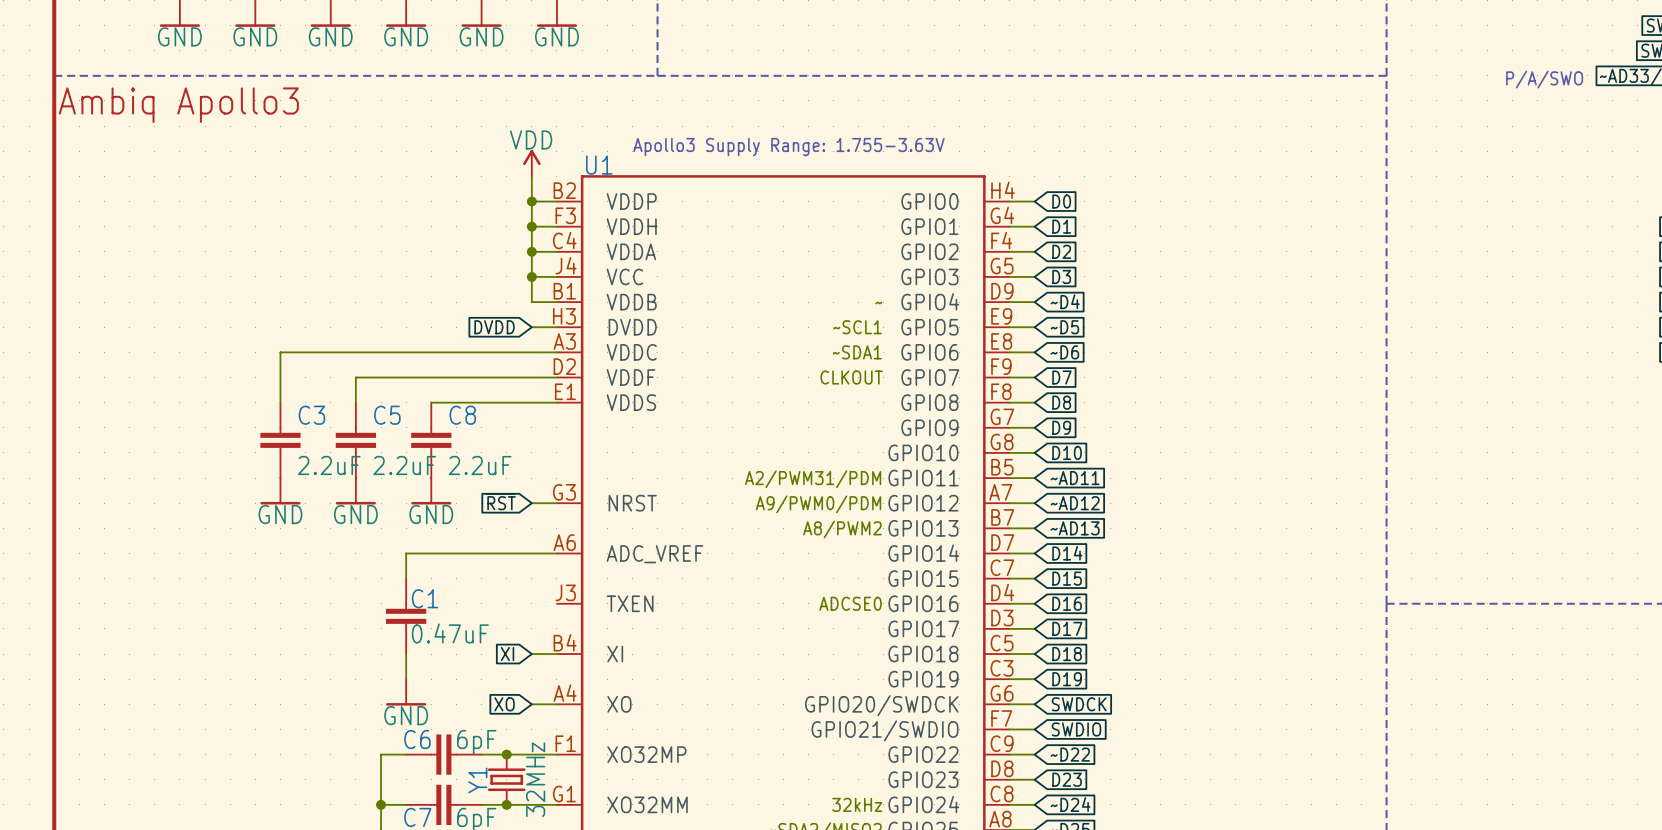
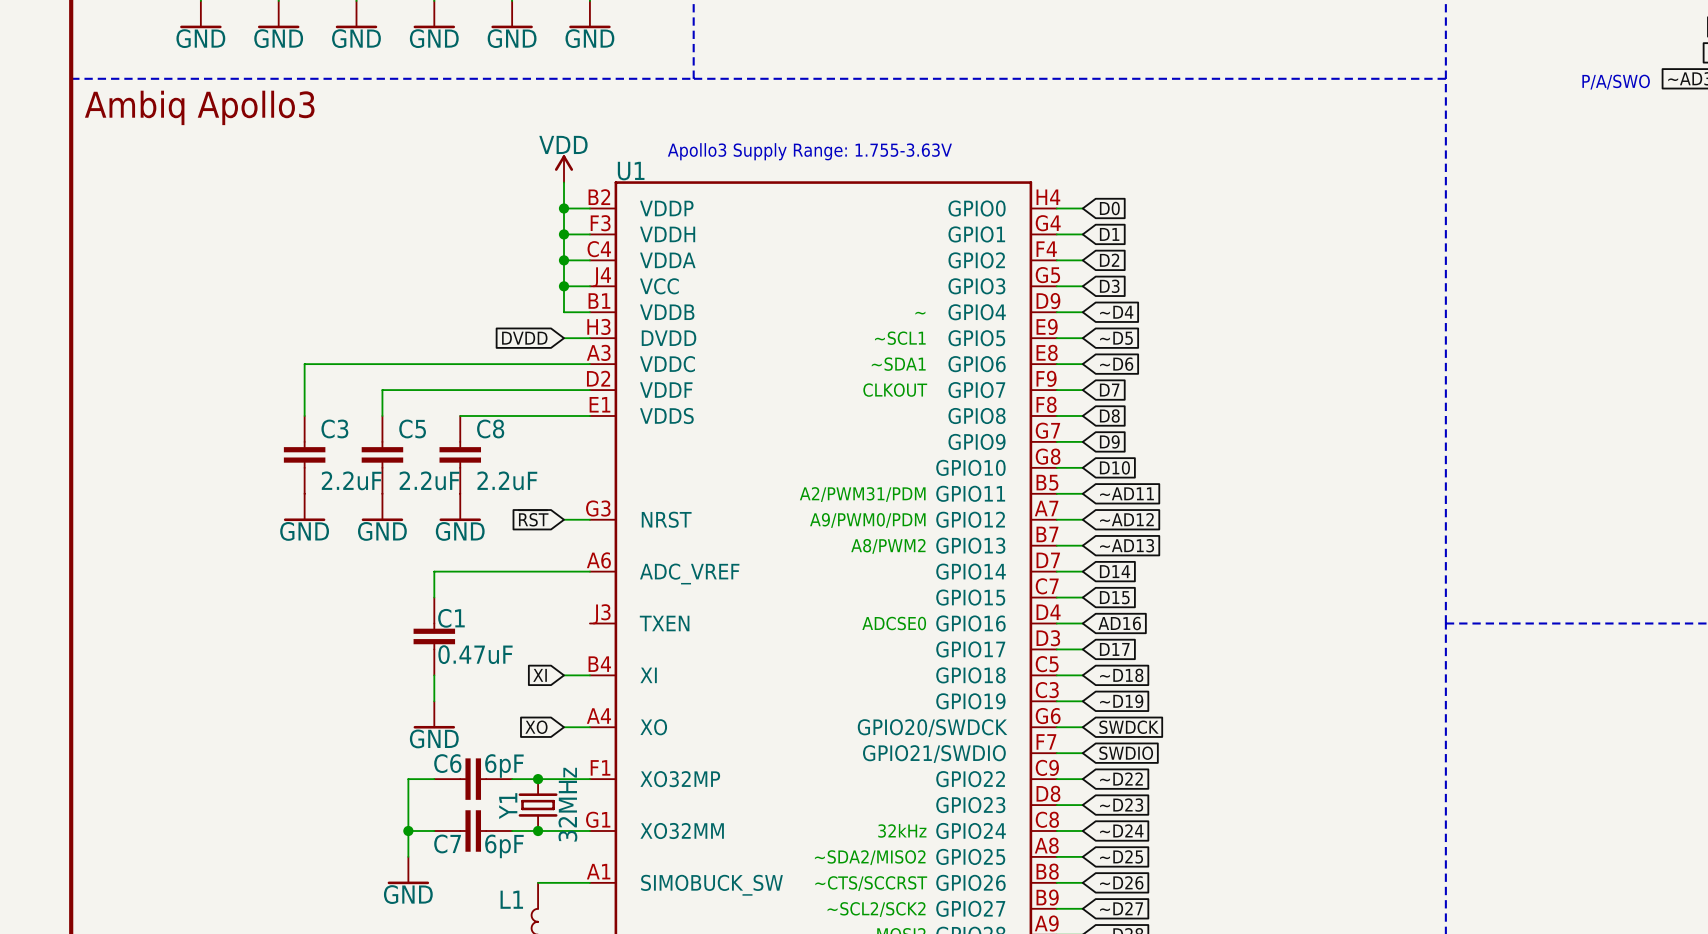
global label: D16 (1067, 603) -> AD16 (1119, 623)
global label: D18 (1067, 654) -> ~D18 (1121, 675)
global label: D19 (1067, 679) -> ~D19 (1121, 701)
global label: D23 (1067, 779) -> ~D23 (1121, 805)

